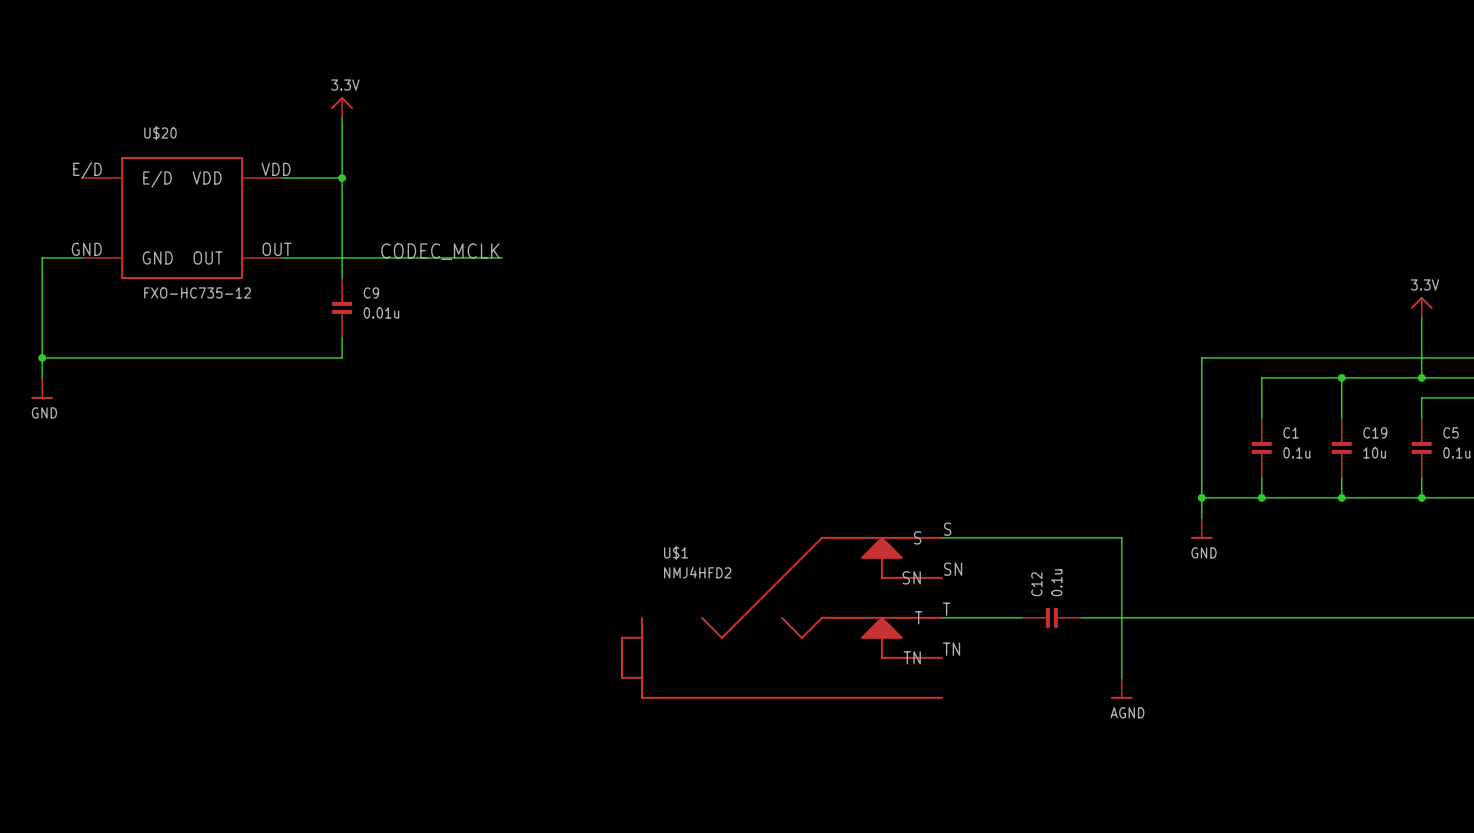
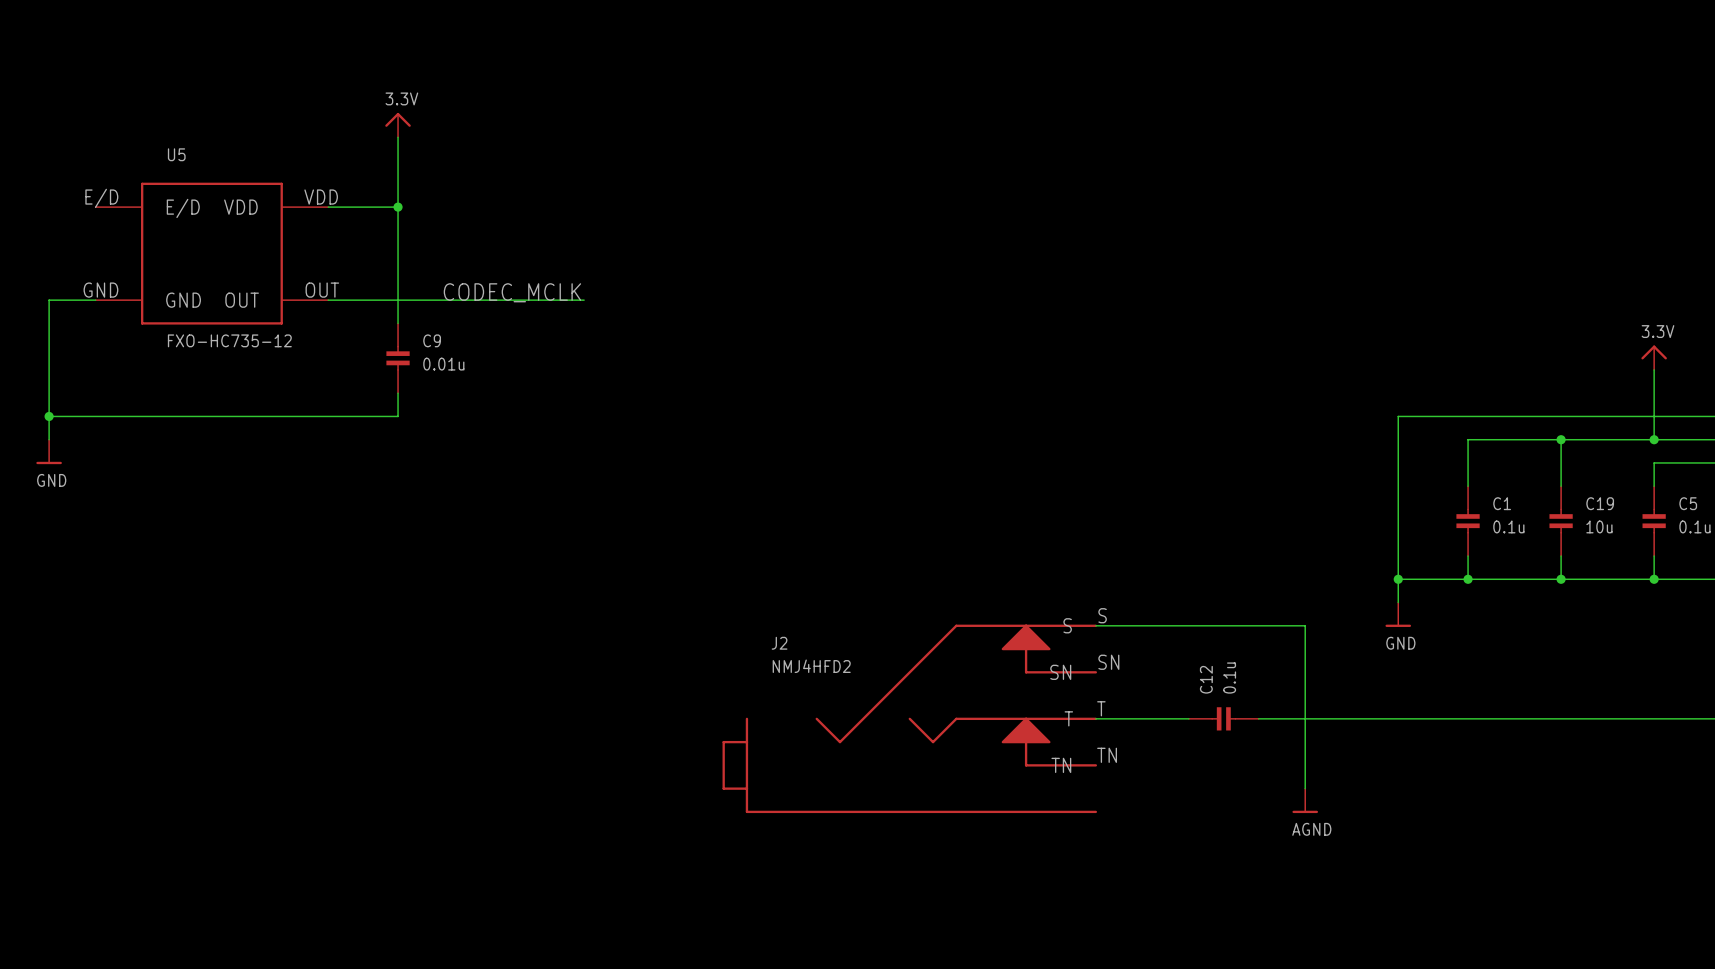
U$20 name: U$20 (160, 133) -> U5 (176, 154)
U$1 name: U$1 (676, 552) -> J2 (779, 643)

